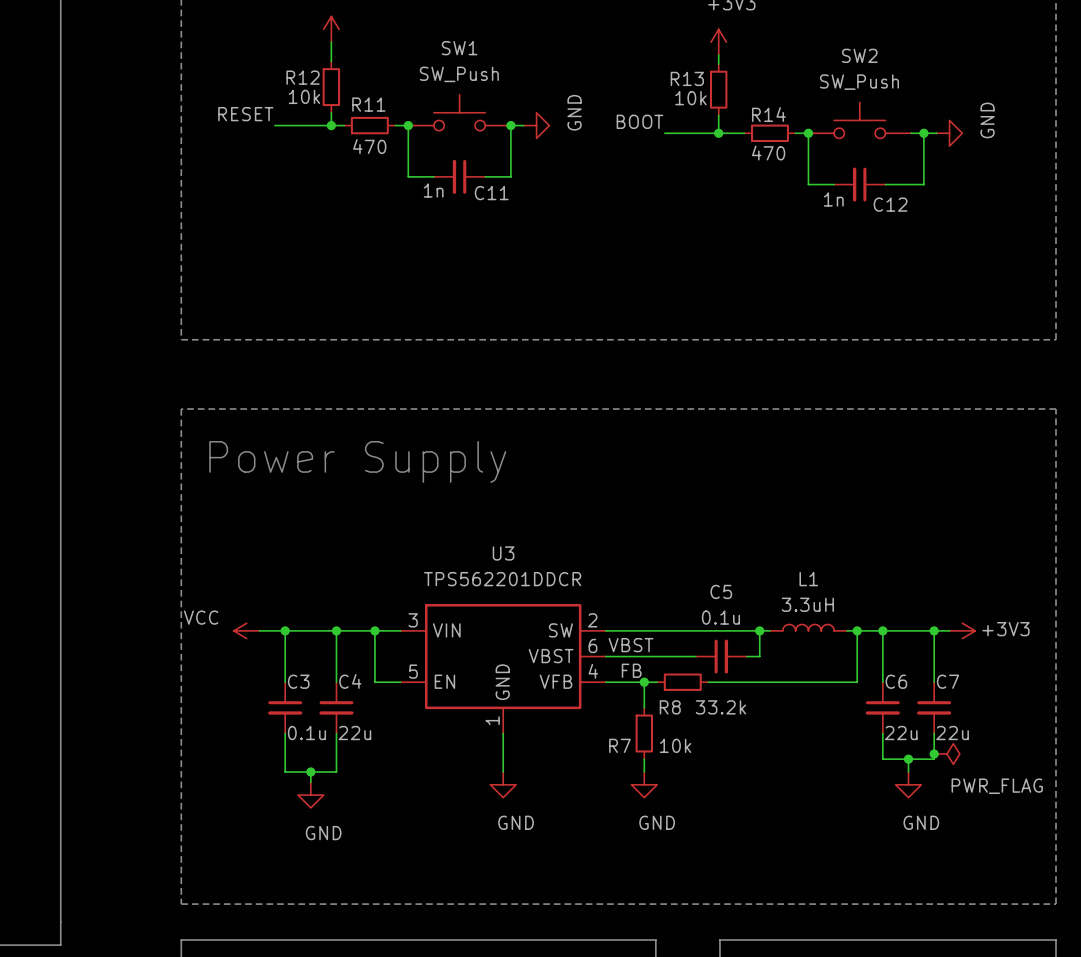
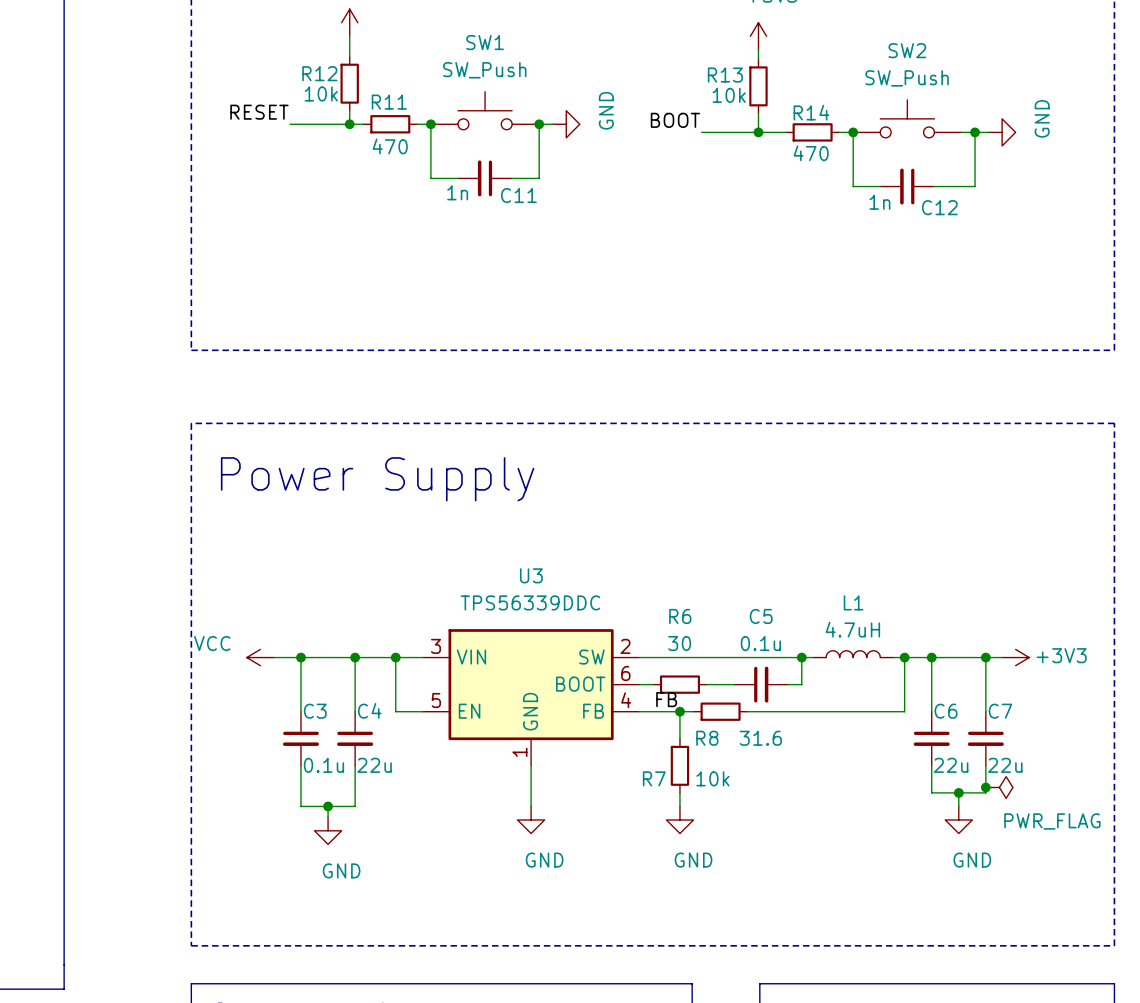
U3 value: TPS562201DDCR (502, 579) -> TPS56339DDC (530, 602)
L1 value: 3.3uH (807, 604) -> 4.7uH (852, 629)
label: VBST (631, 645) -> none
U3 pin name: VBST (551, 656) -> BOOT (580, 684)
wire: (618, 656) (669, 656) -> none
R6: none -> 30 (679, 684)
U3 pin name: VFB (556, 681) -> FB (593, 711)
R8 value: 33.2k (720, 707) -> 31.6 (760, 738)

